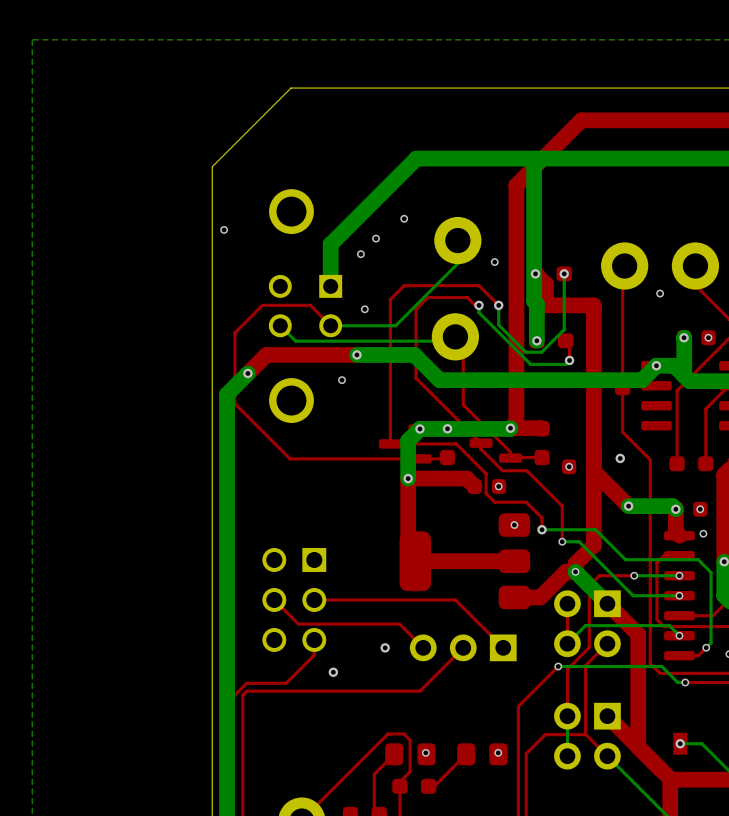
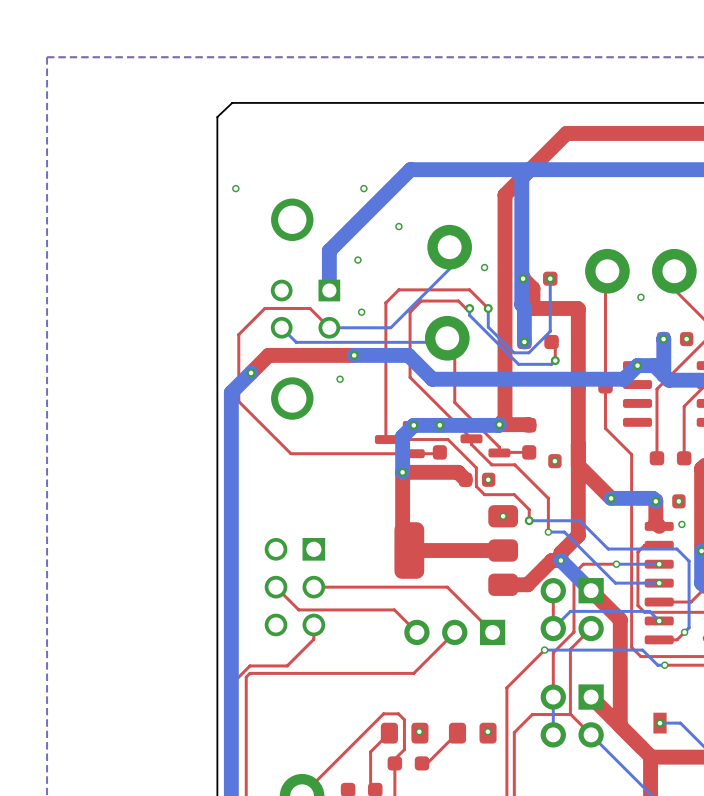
board edge: (291, 88) (212, 166) -> (291, 102) (232, 102) (217, 117) (217, 177)
via position: (224, 229) -> (235, 188)
via position: (376, 238) -> (363, 188)
via: (620, 458) -> none
via: (385, 647) -> none
via: (333, 672) -> none

